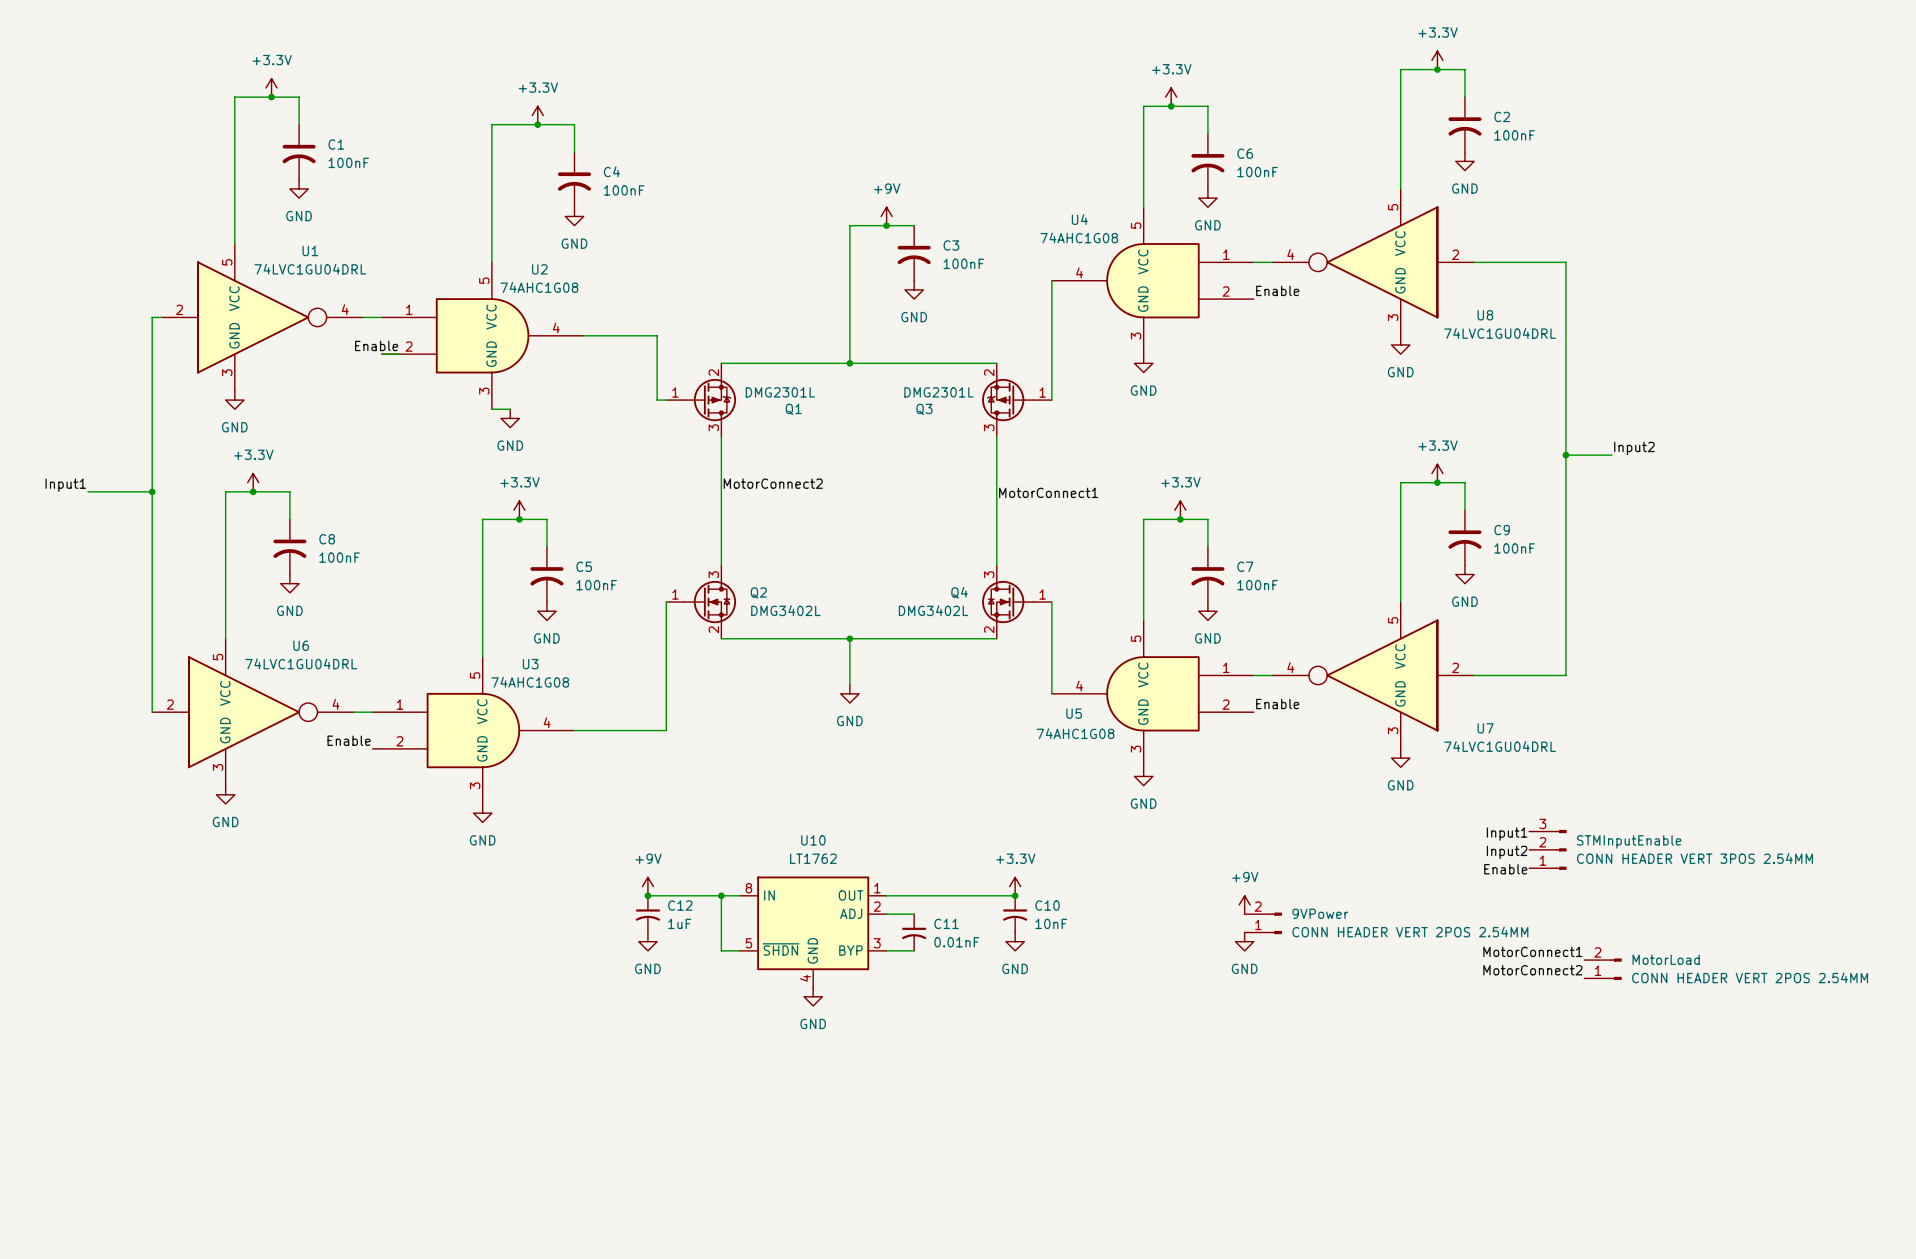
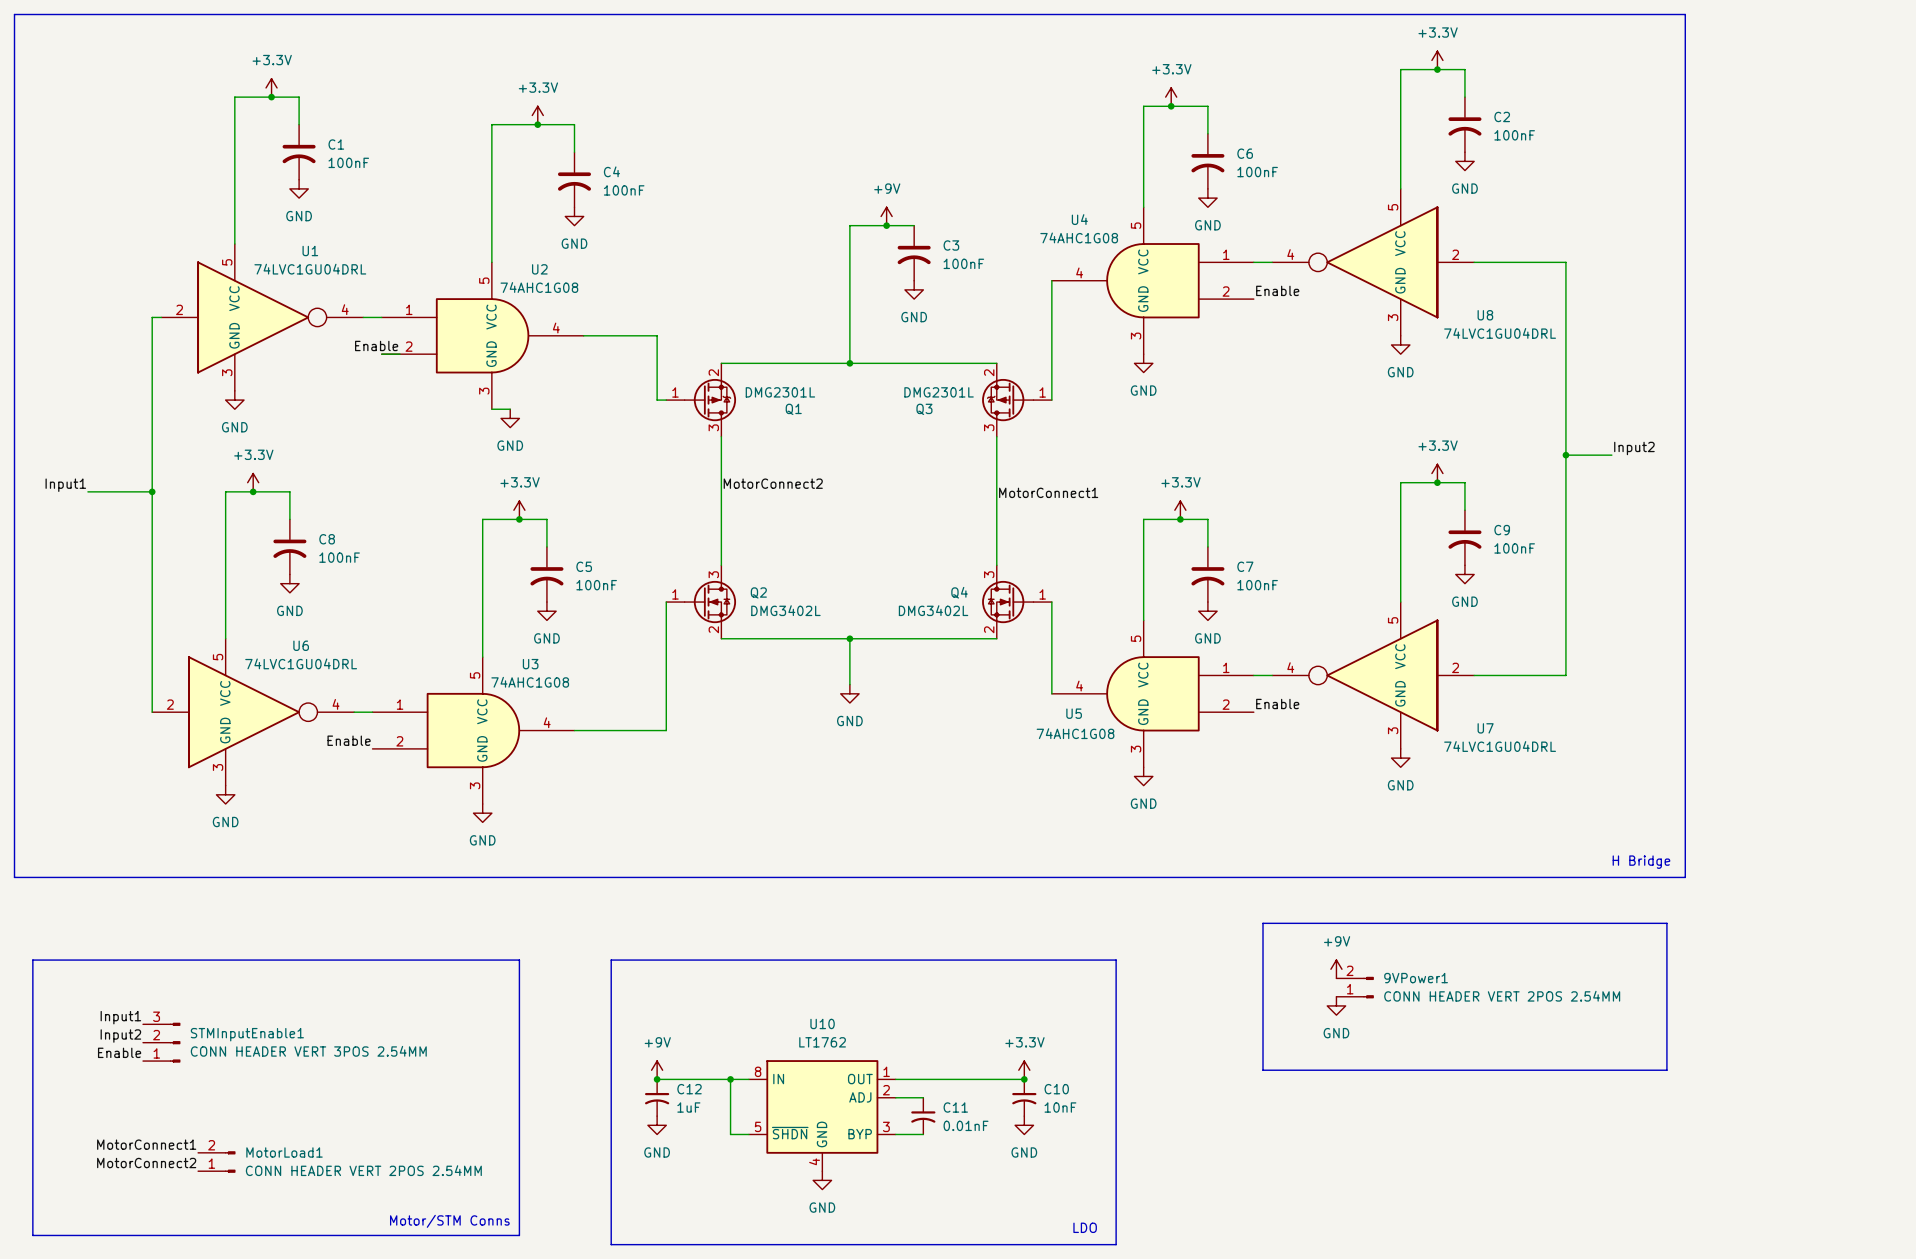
line: none -> (14, 14) (1685, 14) (1685, 877) (14, 877) (14, 14)
label: Input1 (1507, 834) -> none
STMInputEnable: CONN HEADER VERT 3POS 2.54MM (1547, 849) -> none
label: Input2 (1507, 852) -> none
text: none -> H Bridge (1641, 862)
label: Enable (1505, 869) -> none
power symbol: +9V (647, 886) -> none
power symbol: +3.3V (1015, 886) -> none
wire: (647, 895) (739, 895) -> none
junction: (647, 895) -> none
wire: (721, 895) (721, 950) (739, 950) -> none
junction: (721, 895) -> none
wire: (886, 895) (1015, 895) -> none
junction: (1015, 895) -> none
power symbol position: +9V (1244, 904) -> +9V (1336, 969)
C12 position: (647, 914) -> (657, 1097)
wire: (886, 914) (914, 914) -> none
C10 position: (1015, 914) -> (1024, 1097)
line: none -> (1263, 923) (1263, 1070) (1666, 1070) (1666, 923) (1263, 923)
9VPower: CONN HEADER VERT 2POS 2.54MM (1263, 923) -> none
U10 position: (813, 932) -> (822, 1115)
C11 position: (914, 932) -> (923, 1116)
power symbol: GND (647, 941) -> none
power symbol: GND (1015, 941) -> none
power symbol position: GND (1244, 941) -> GND (1336, 1005)
wire: (886, 950) (914, 950) -> (895, 1097) (923, 1097)
label: MotorConnect1 (1532, 951) -> none
line: none -> (32, 960) (32, 1235) (519, 1235) (519, 960) (32, 960)
line: none -> (611, 960) (611, 1244) (1116, 1244) (1116, 960) (611, 960)
MotorLoad: CONN HEADER VERT 2POS 2.54MM (1602, 969) -> none
label: MotorConnect2 (1532, 970) -> none
9VPower1: none -> CONN HEADER VERT 2POS 2.54MM (1355, 987)
power symbol: GND (813, 996) -> none
label: none -> Input1 (120, 1017)
label: none -> Input2 (120, 1036)
STMInputEnable1: none -> CONN HEADER VERT 3POS 2.54MM (161, 1042)
label: none -> Enable (119, 1052)
power symbol: none -> +9V (657, 1070)
power symbol: none -> +3.3V (1024, 1070)
wire: none -> (657, 1079) (748, 1079)
junction: none -> (657, 1079)
wire: none -> (730, 1079) (730, 1134) (748, 1134)
junction: none -> (730, 1079)
wire: none -> (895, 1079) (1024, 1079)
junction: none -> (1024, 1079)
power symbol: none -> GND (657, 1125)
power symbol: none -> GND (1024, 1125)
wire: none -> (895, 1134) (923, 1134)
label: none -> MotorConnect1 (146, 1144)
MotorLoad1: none -> CONN HEADER VERT 2POS 2.54MM (216, 1162)
label: none -> MotorConnect2 (146, 1163)
power symbol: none -> GND (822, 1180)
text: none -> Motor/STM Conns (449, 1221)
text: none -> LDO (1085, 1227)

